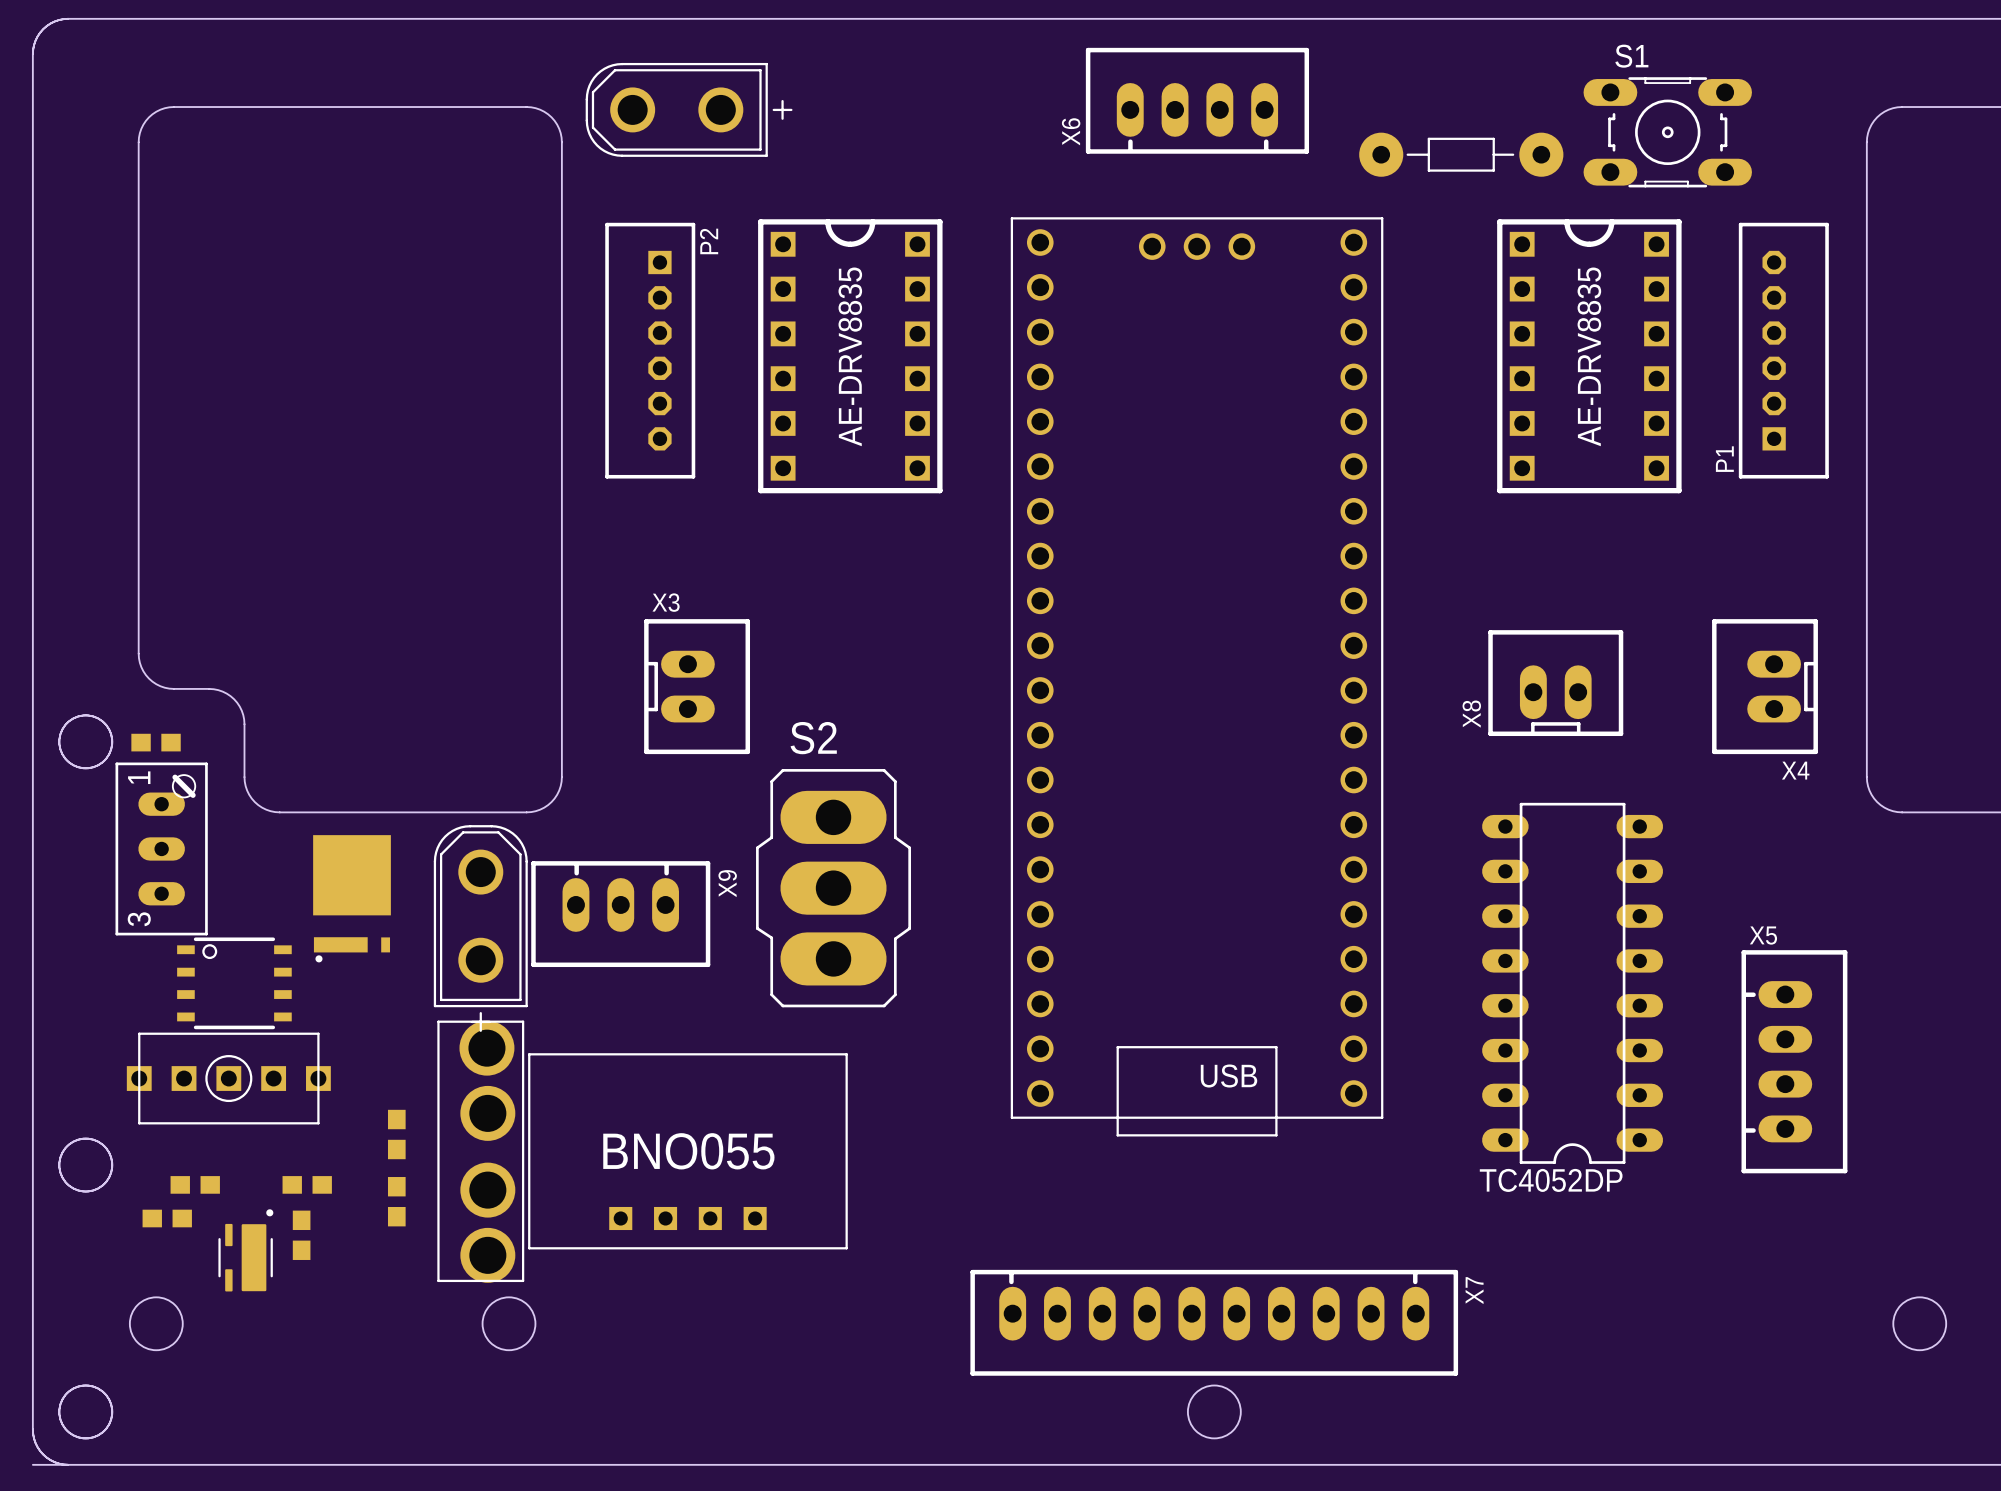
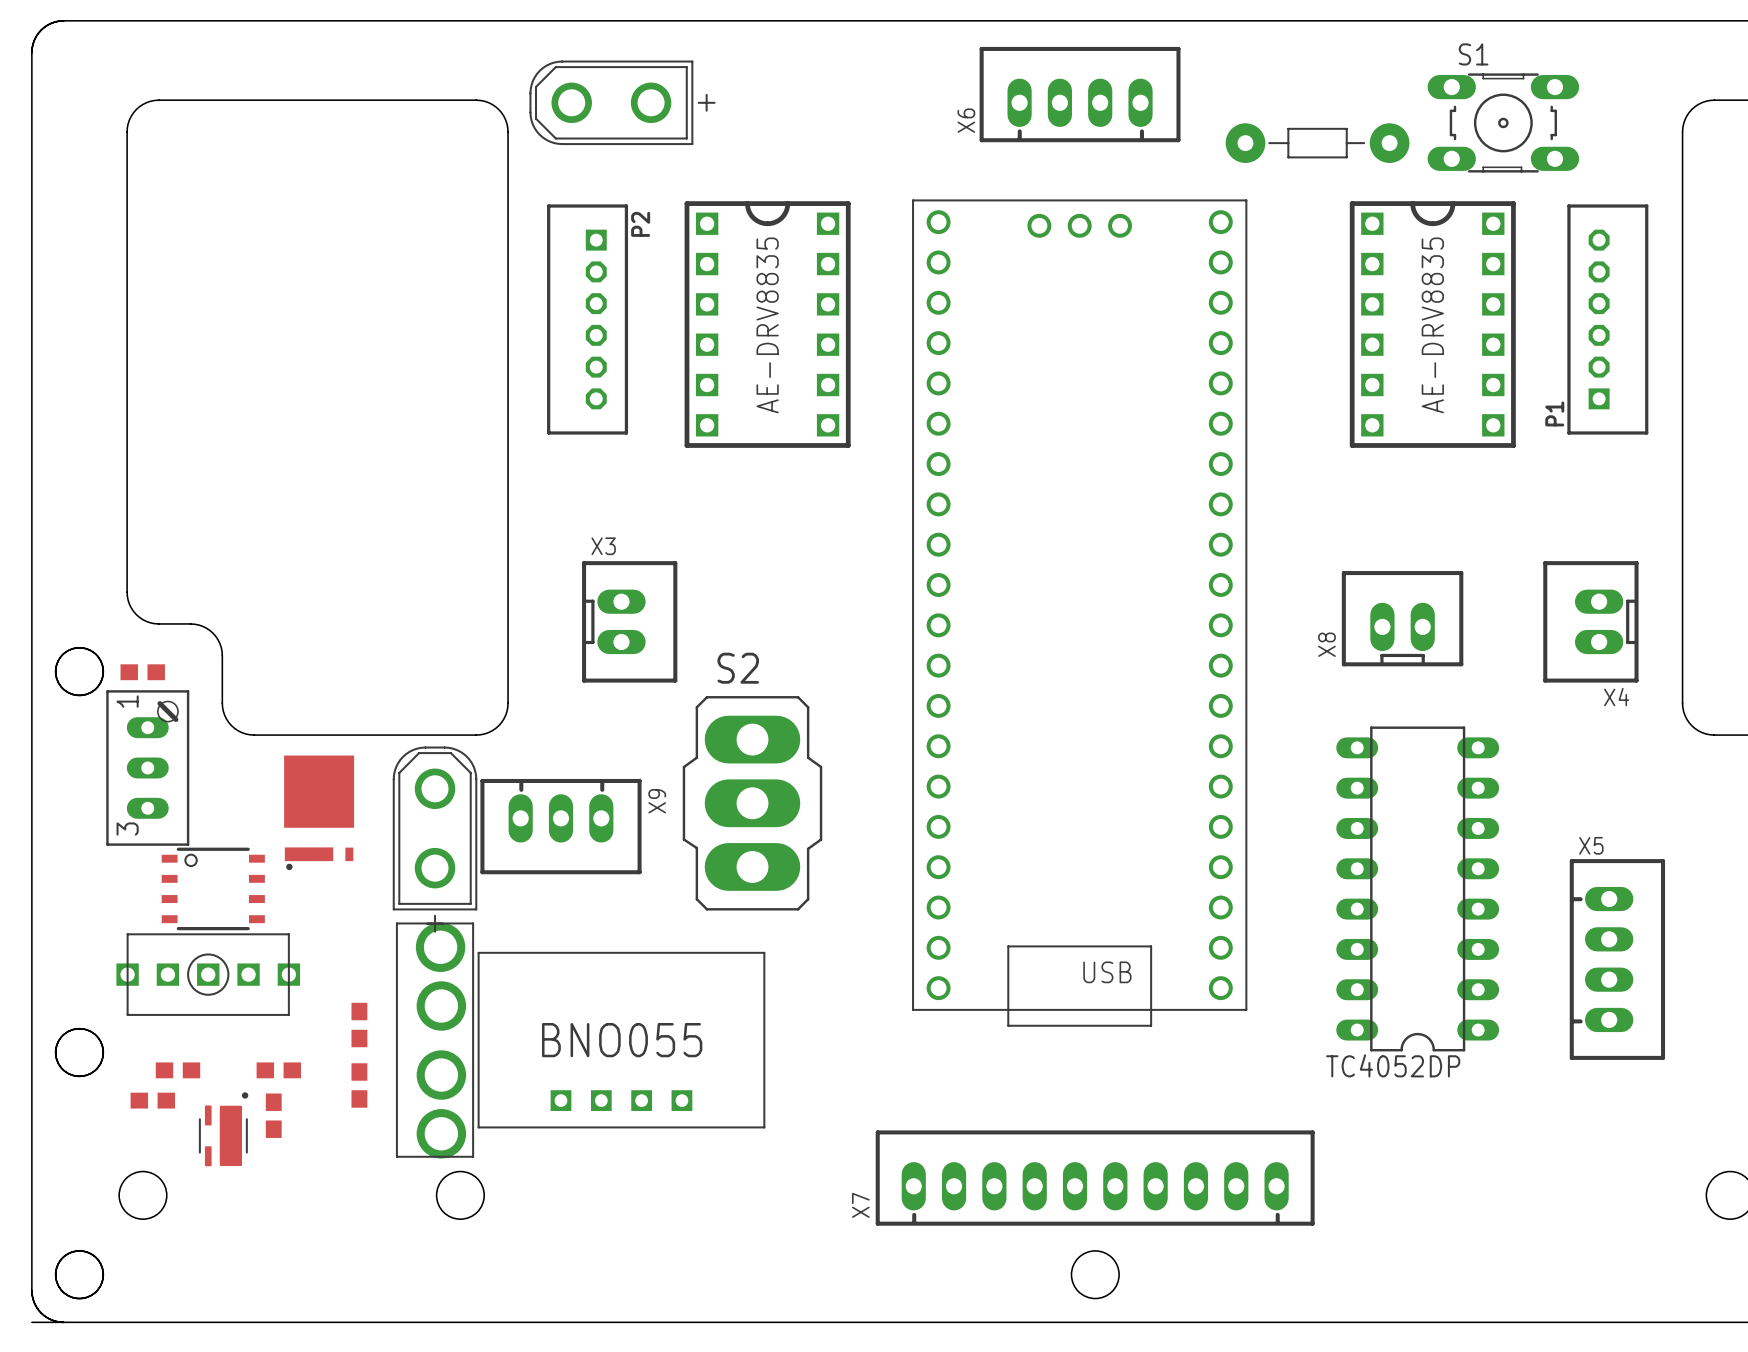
X7 rotation: 0° (1214, 1322) -> 180° (1095, 1178)

